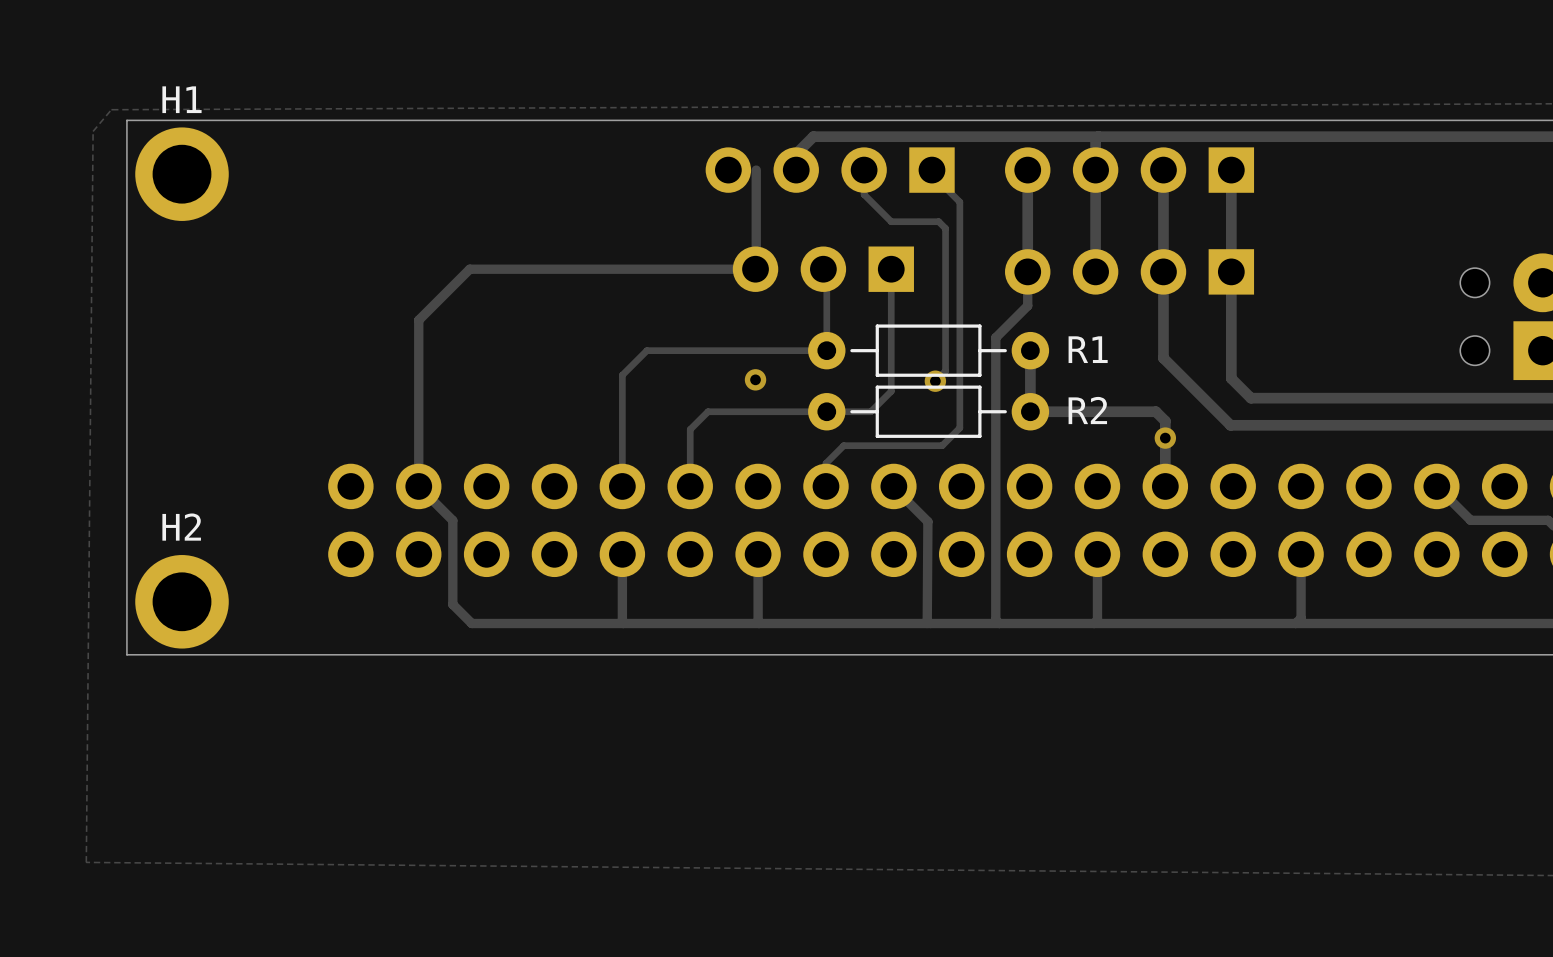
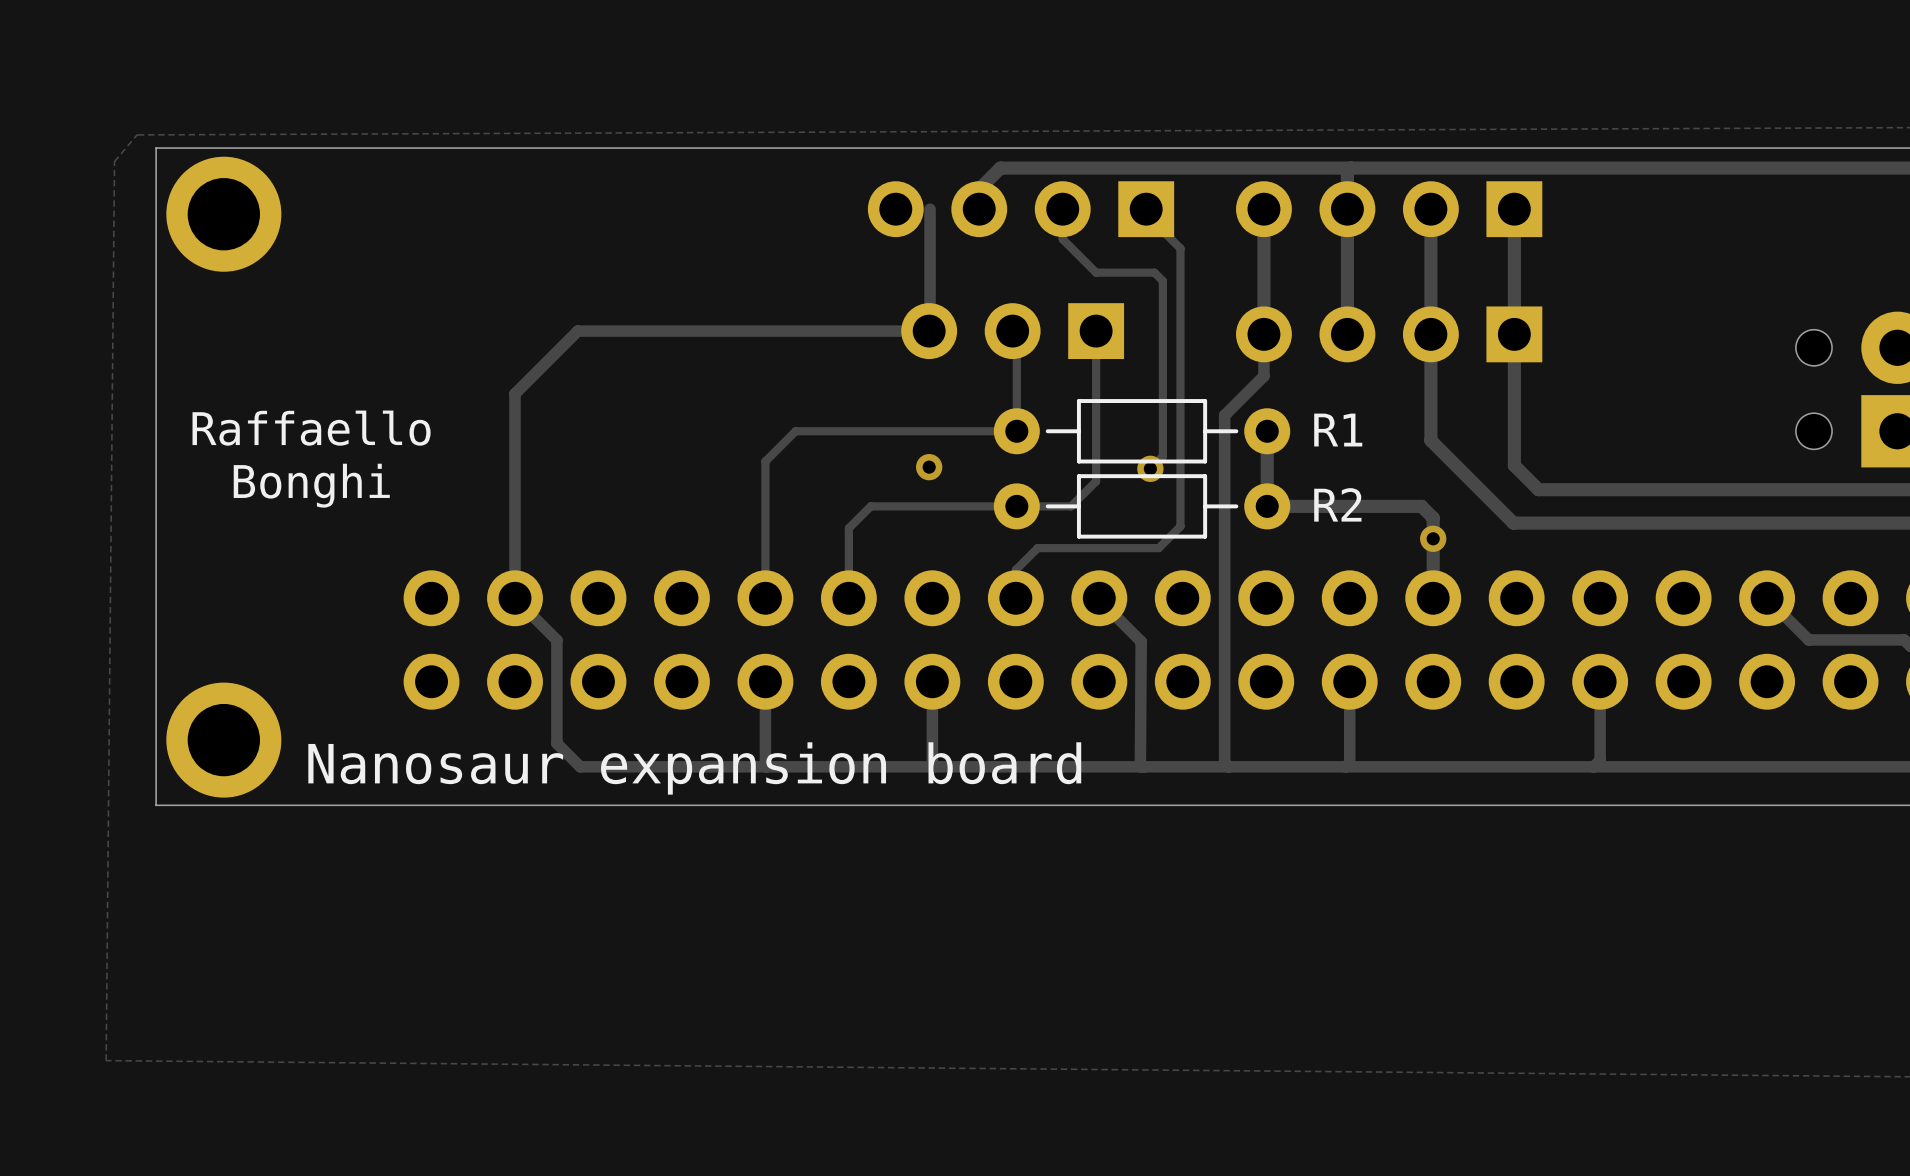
H1 name: H1 (181, 99) -> none
text: none -> Raffaello (311, 428)
text: none -> Bonghi (311, 485)
H2 name: H2 (181, 527) -> none
text: none -> Nanosaur expansion board (694, 768)

